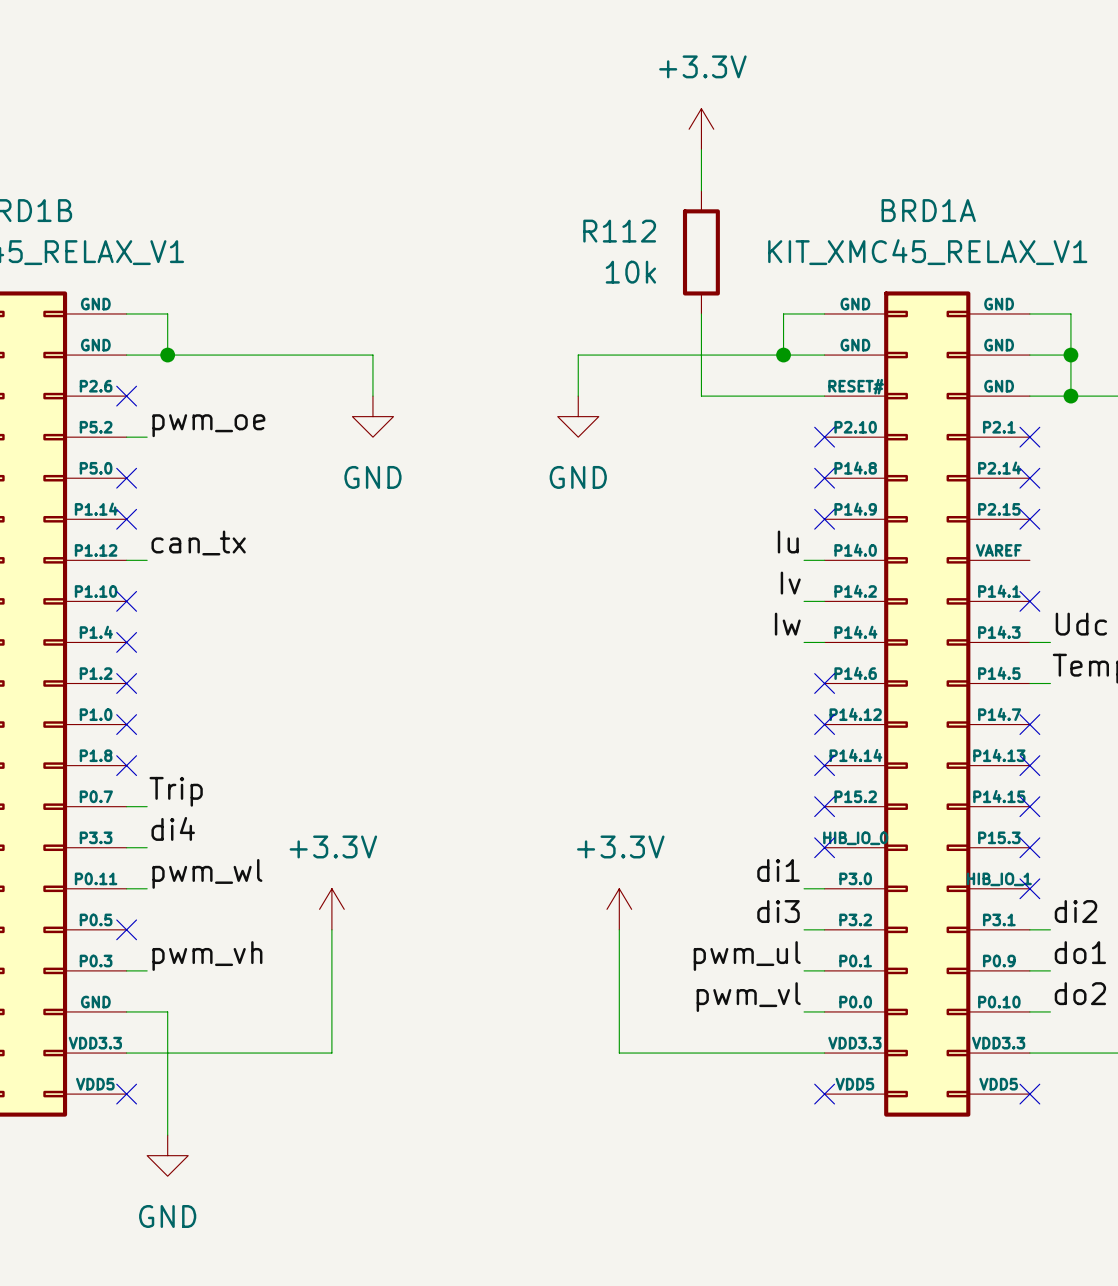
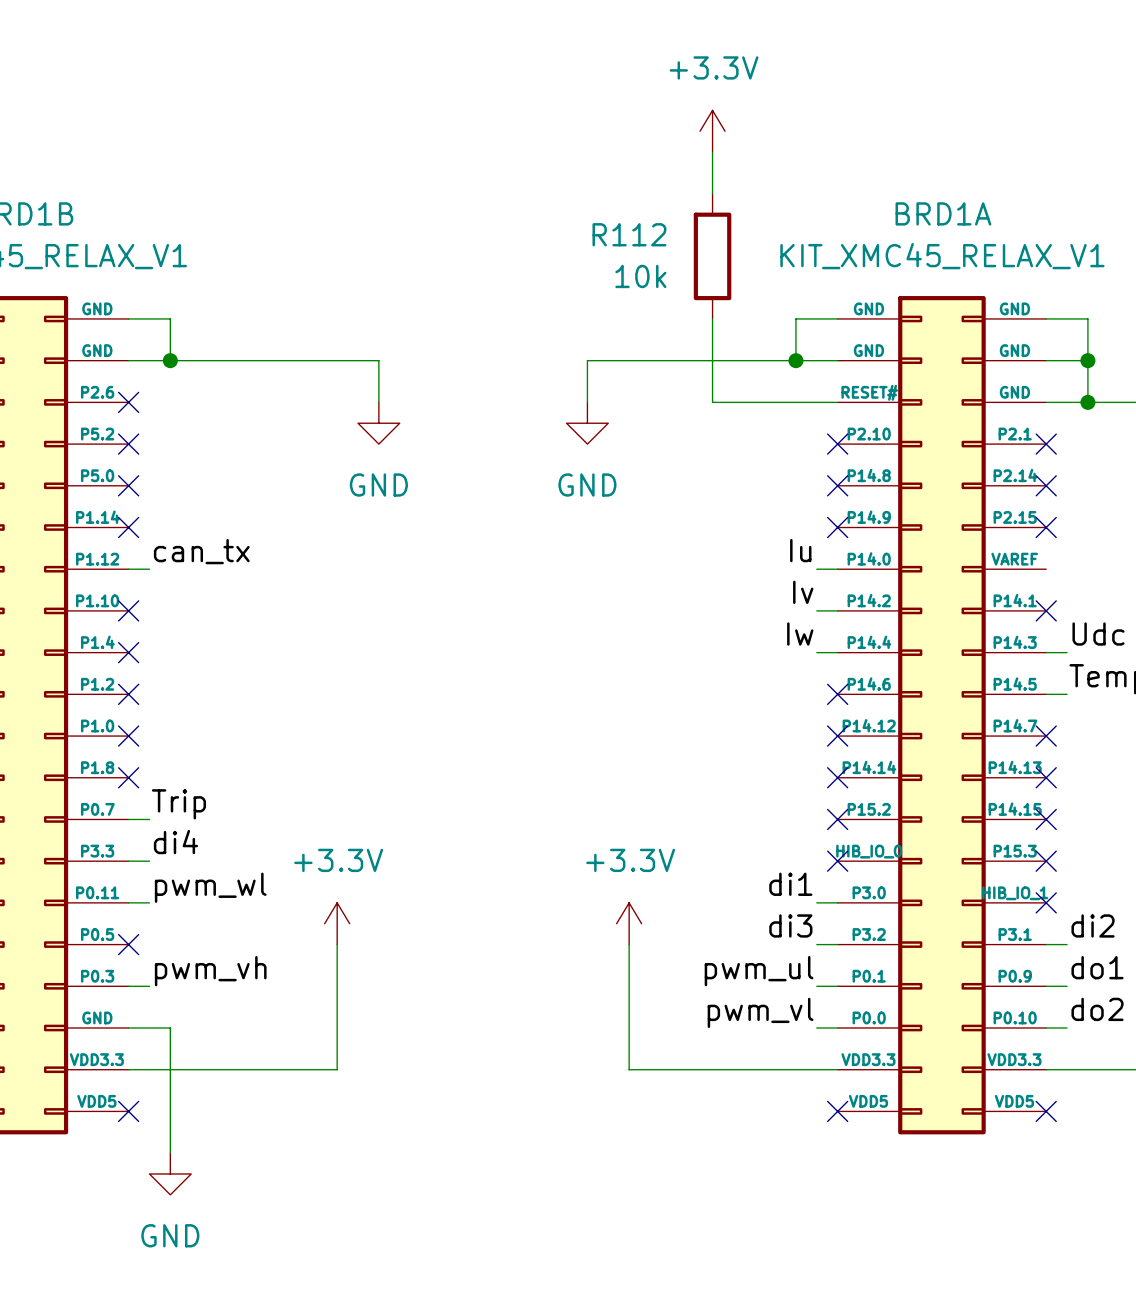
label: pwm_oe (208, 425) -> none
wire: (126, 437) (147, 437) -> none
no-connect mark: none -> (128, 444)

